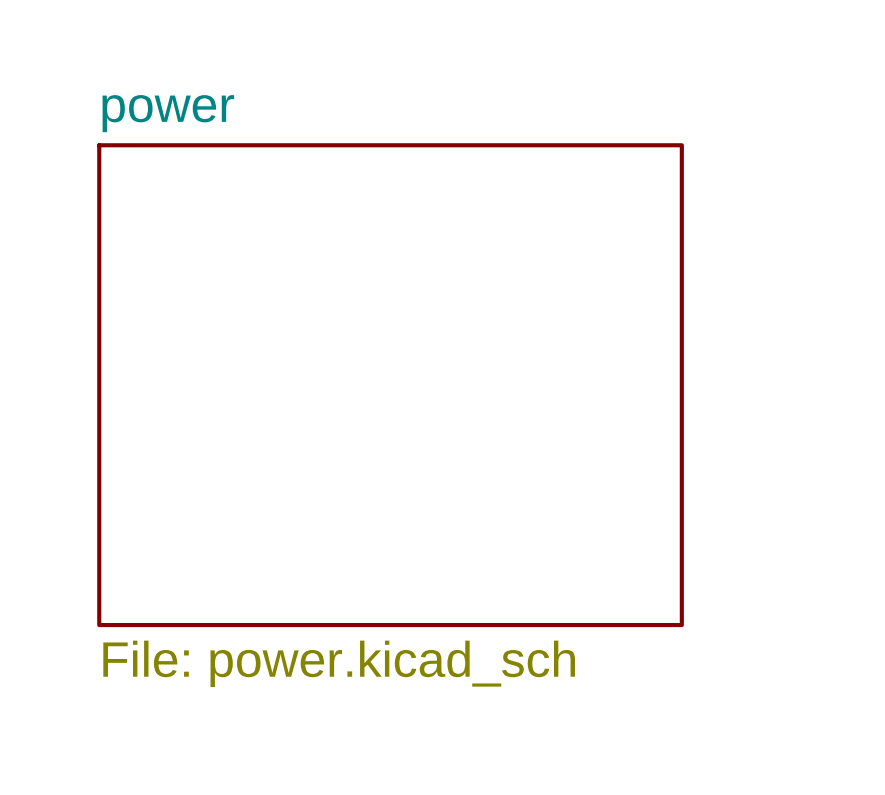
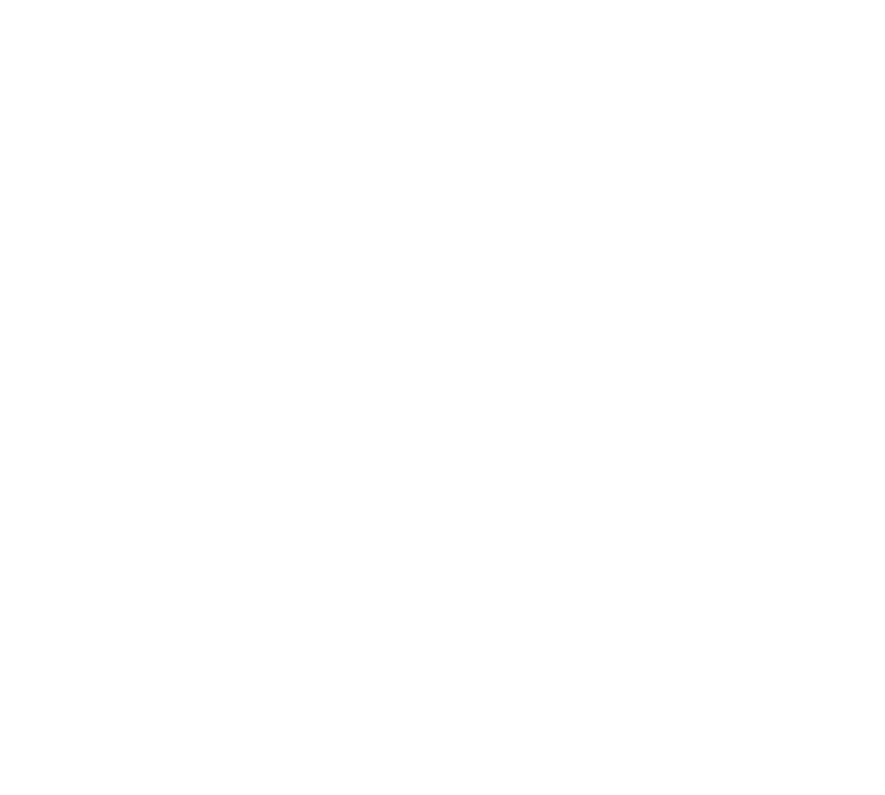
sheet power: File: power.kicad_sch (390, 385) -> none

